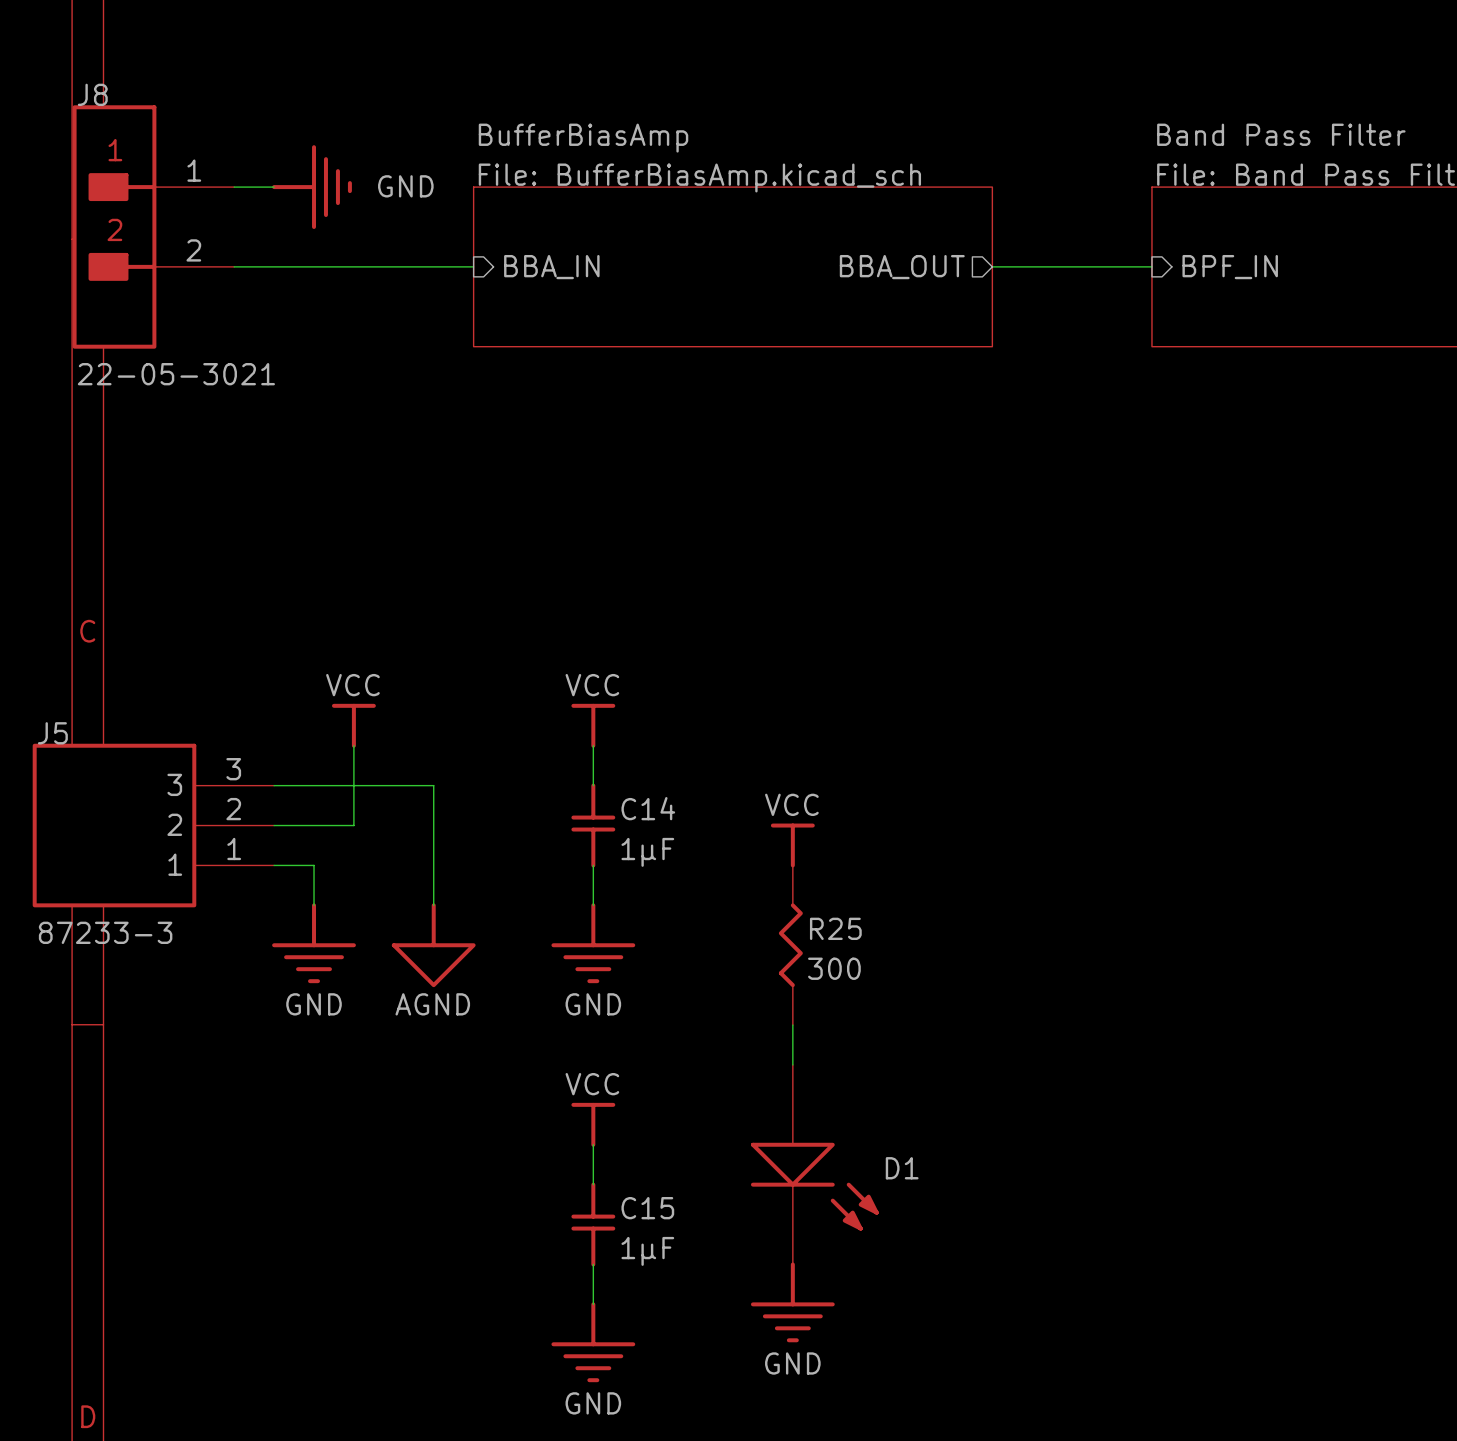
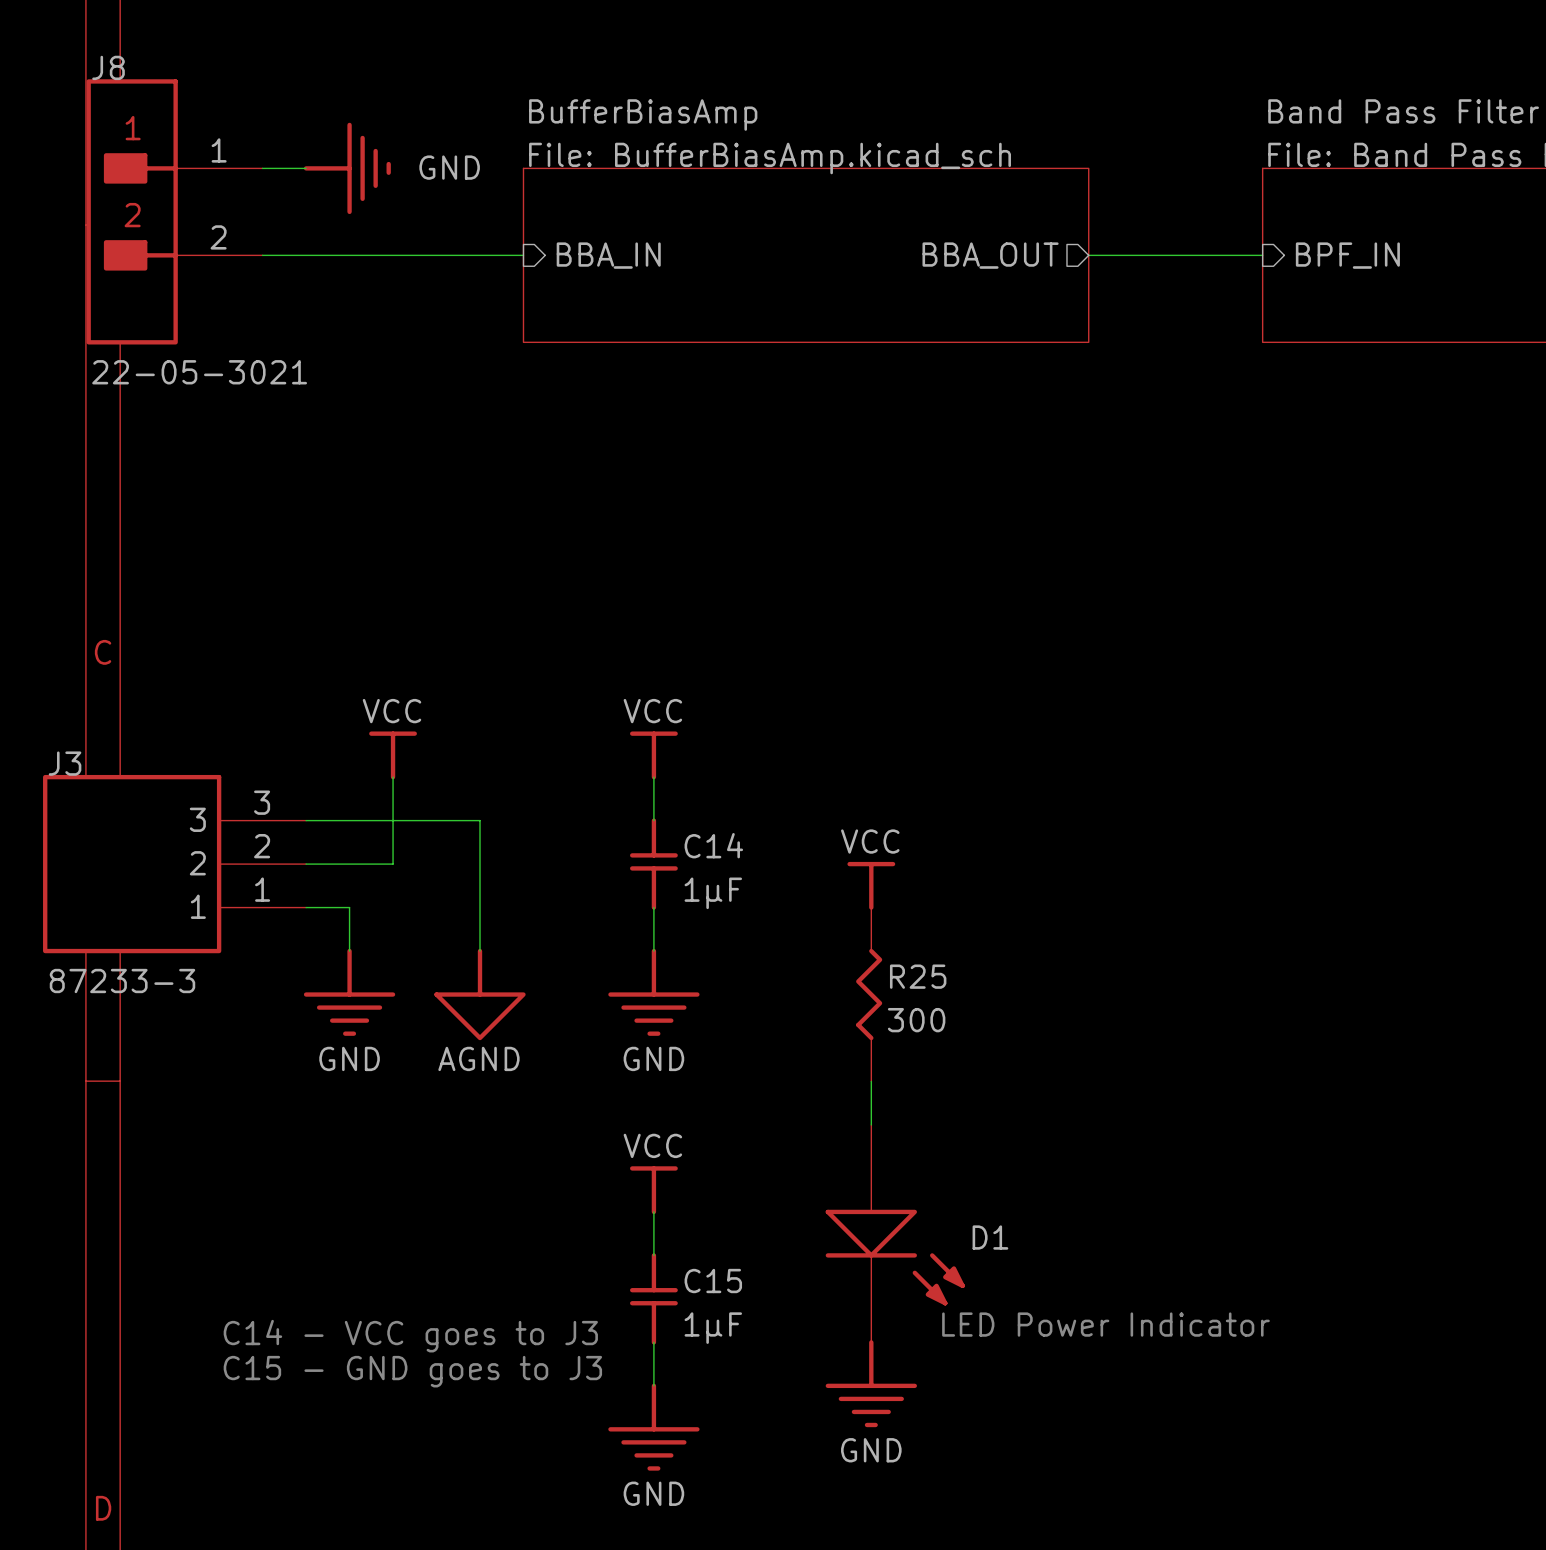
J5 name: J5 (52, 733) -> J3 (65, 763)
text: none -> LED Power Indicator (1105, 1324)
text: none -> C14 - VCC goes to J3 (410, 1336)
text: none -> C15 - GND goes to J3 (412, 1371)

